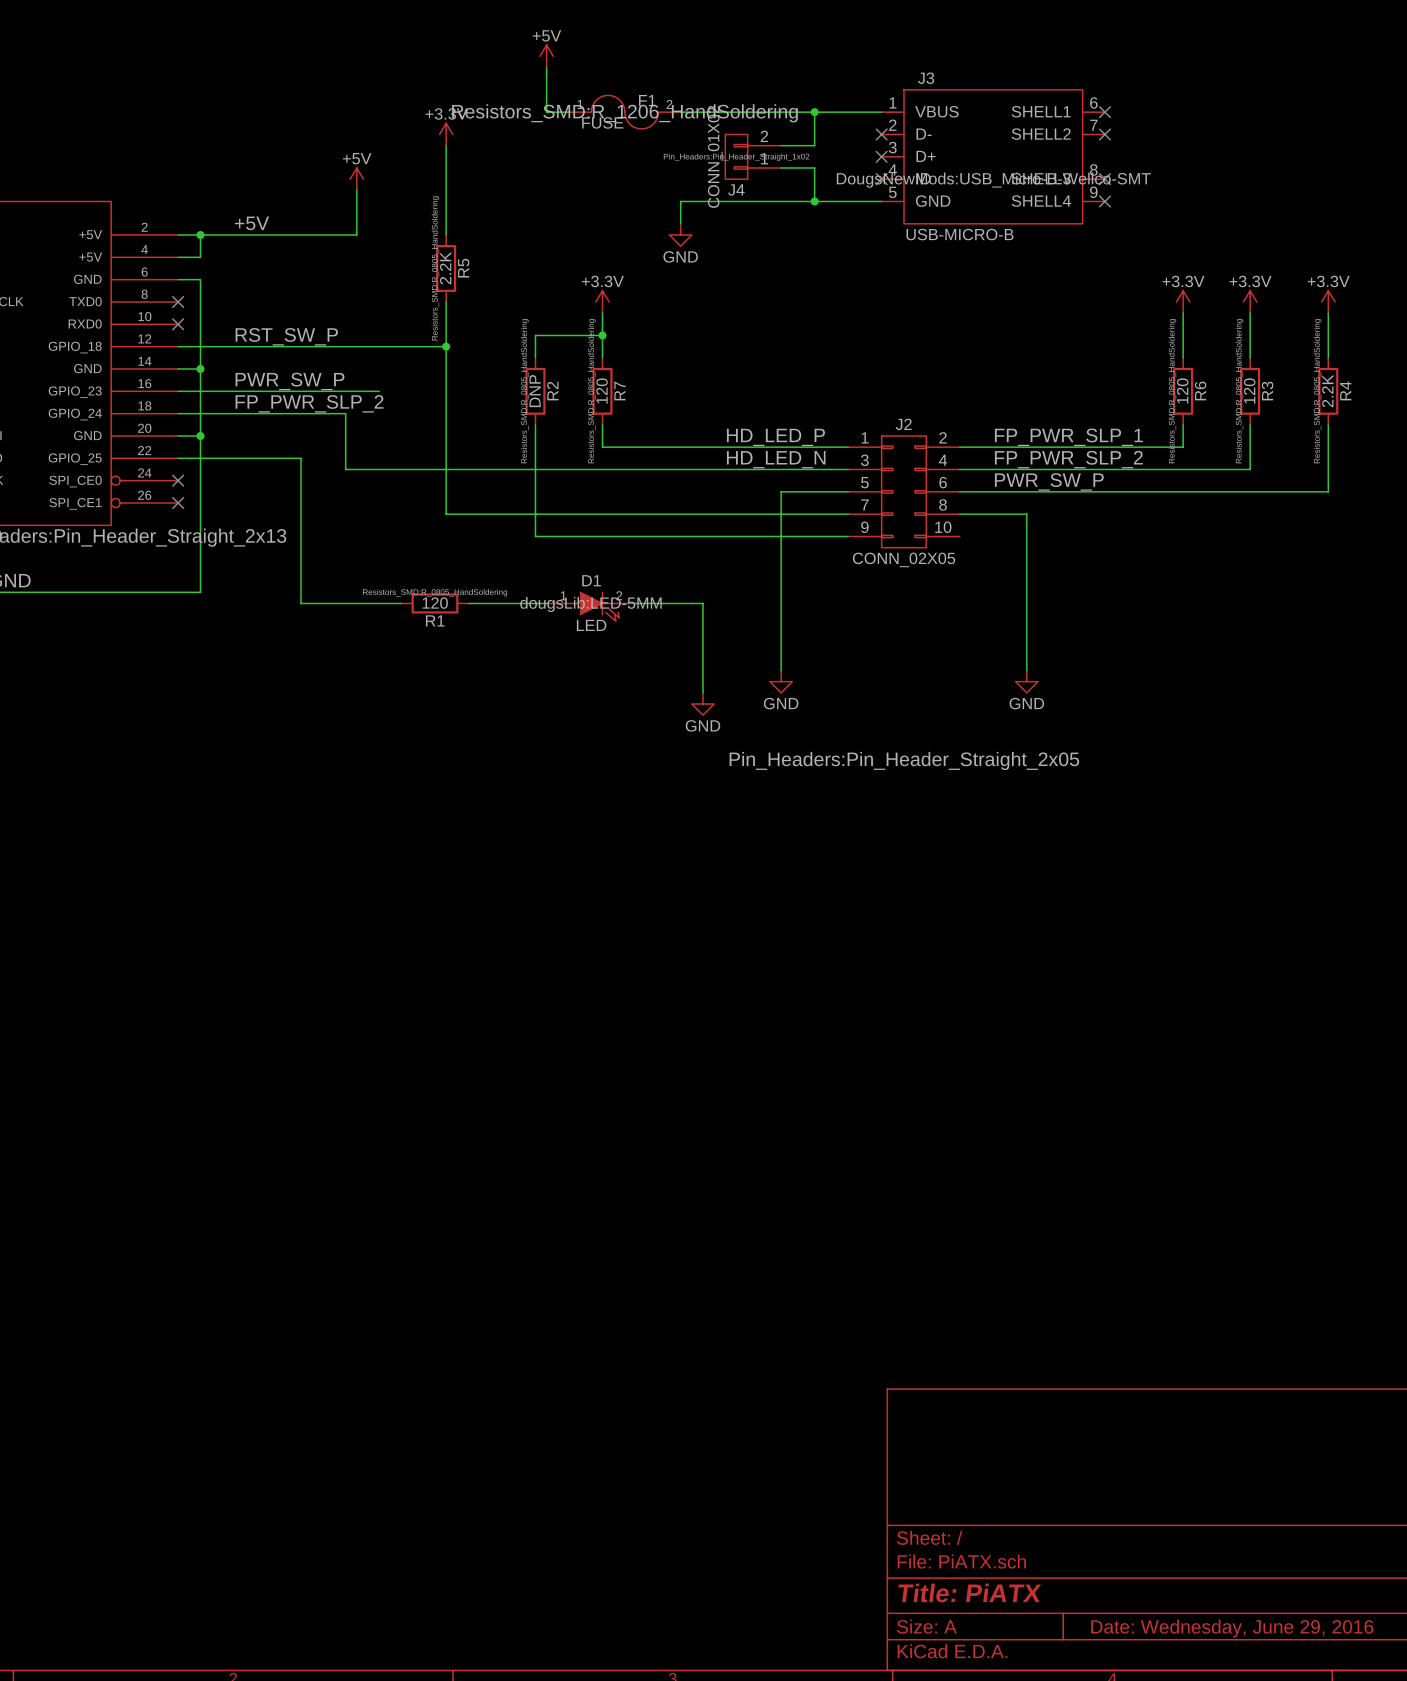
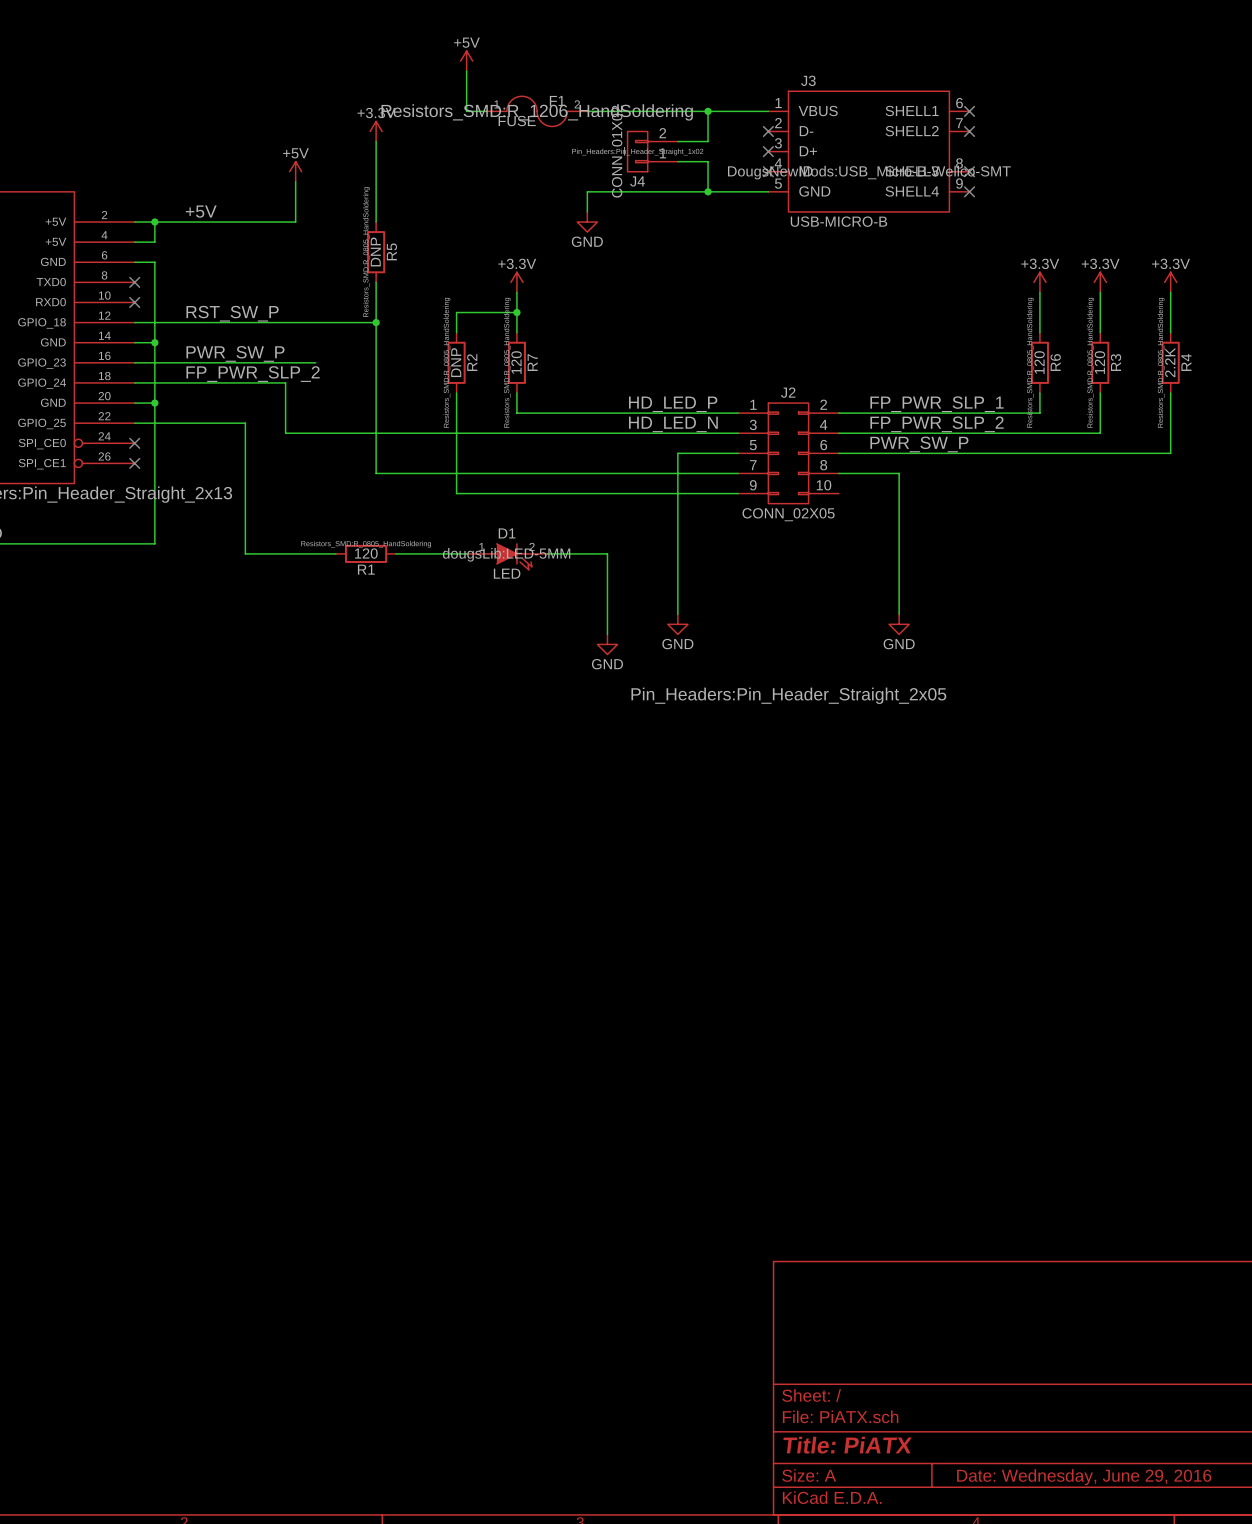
R5 value: 2.2K (445, 268) -> DNP (375, 251)

